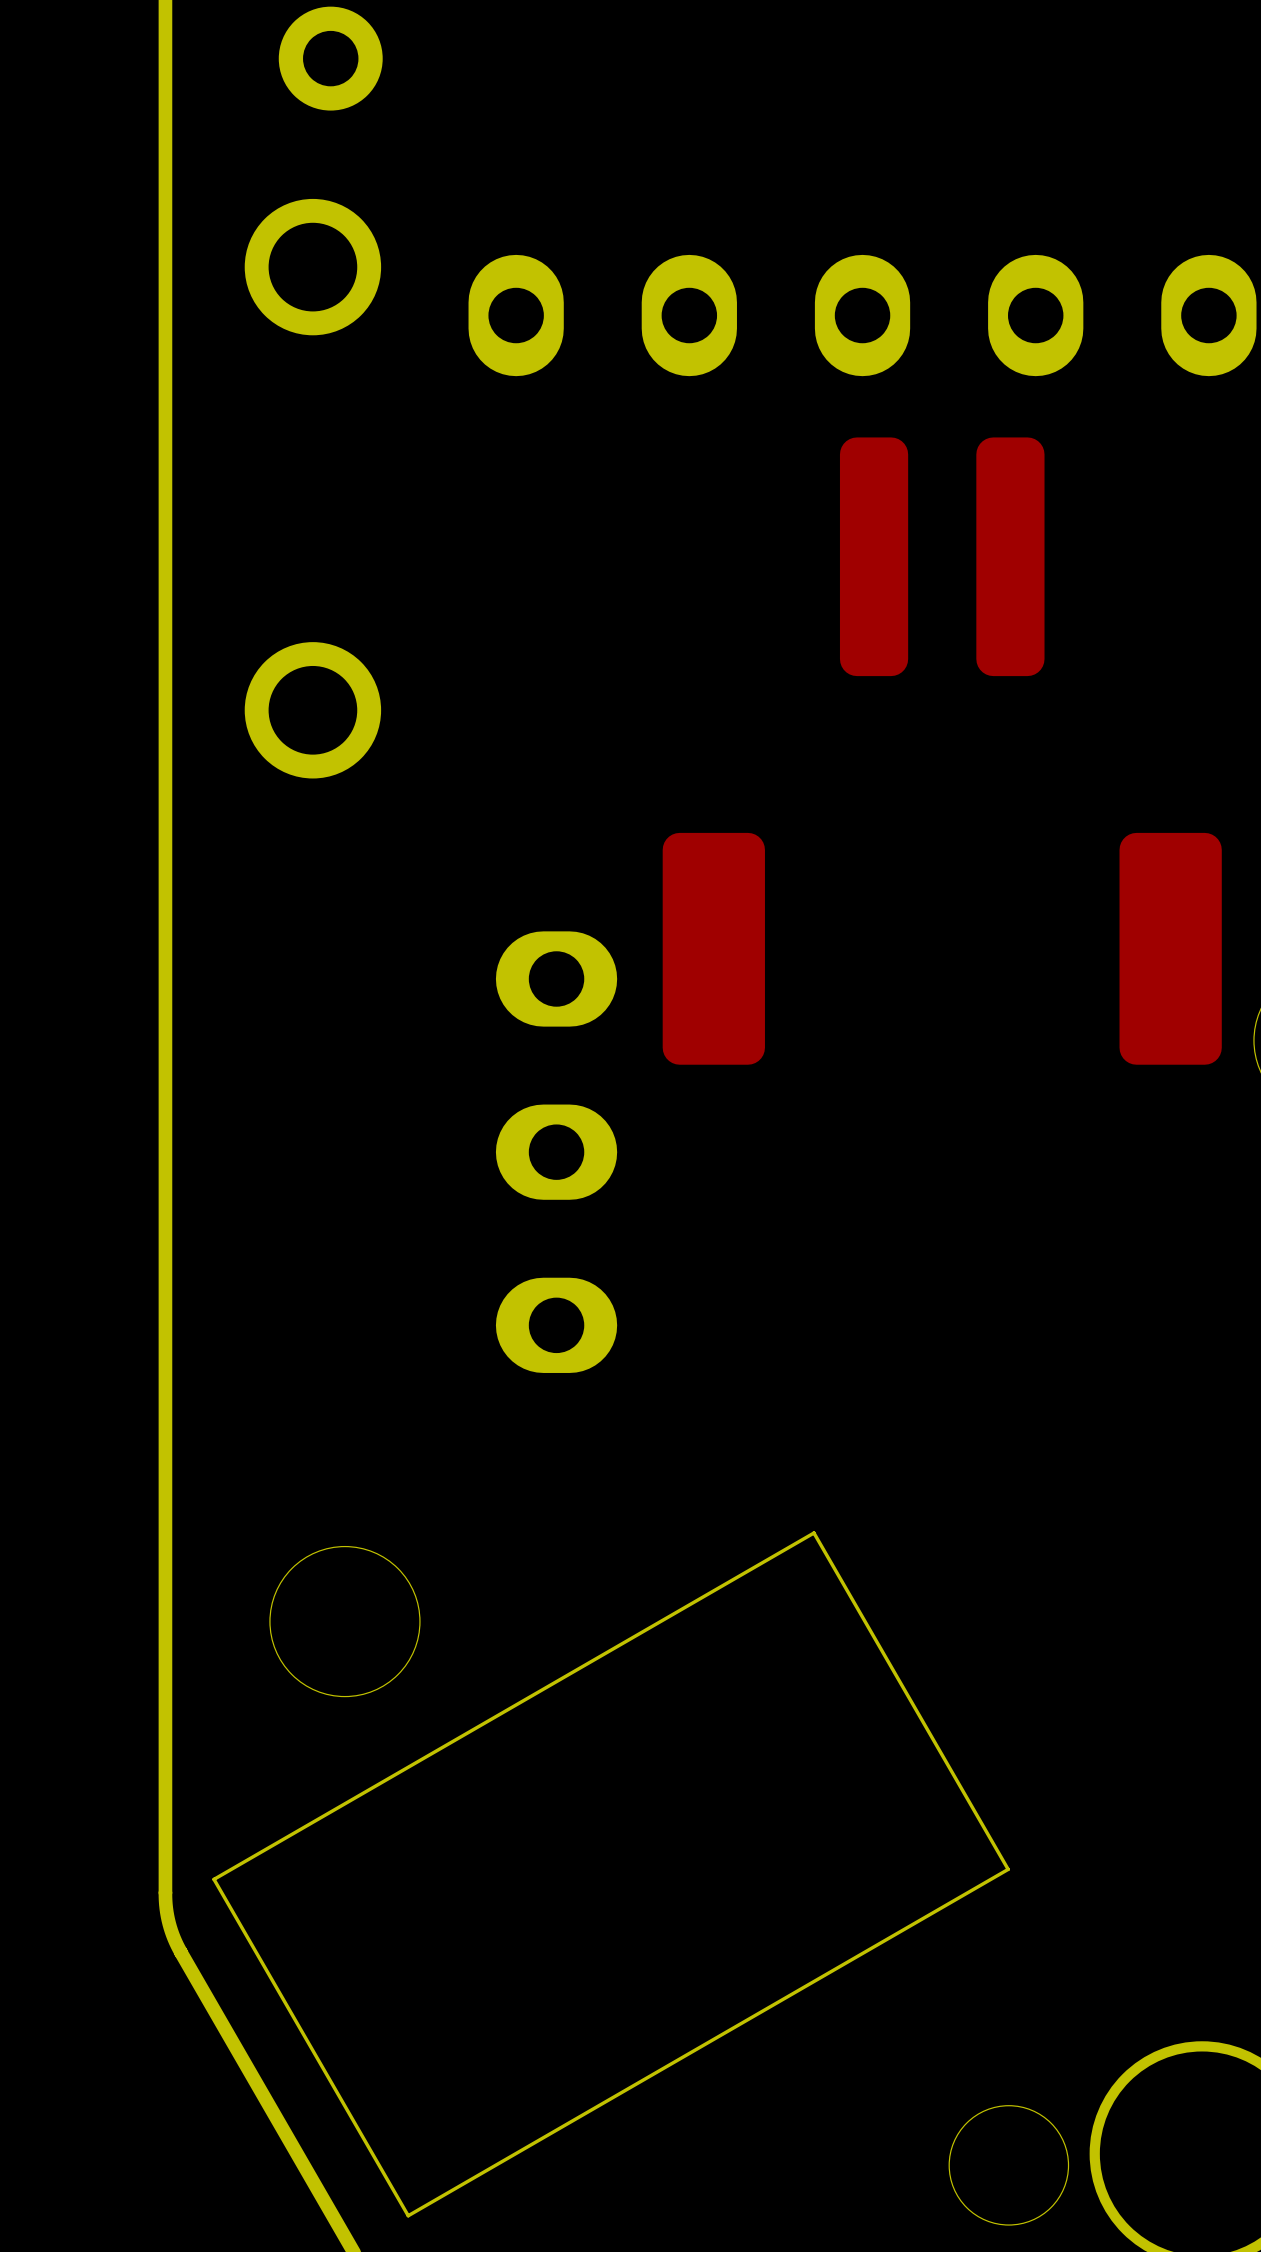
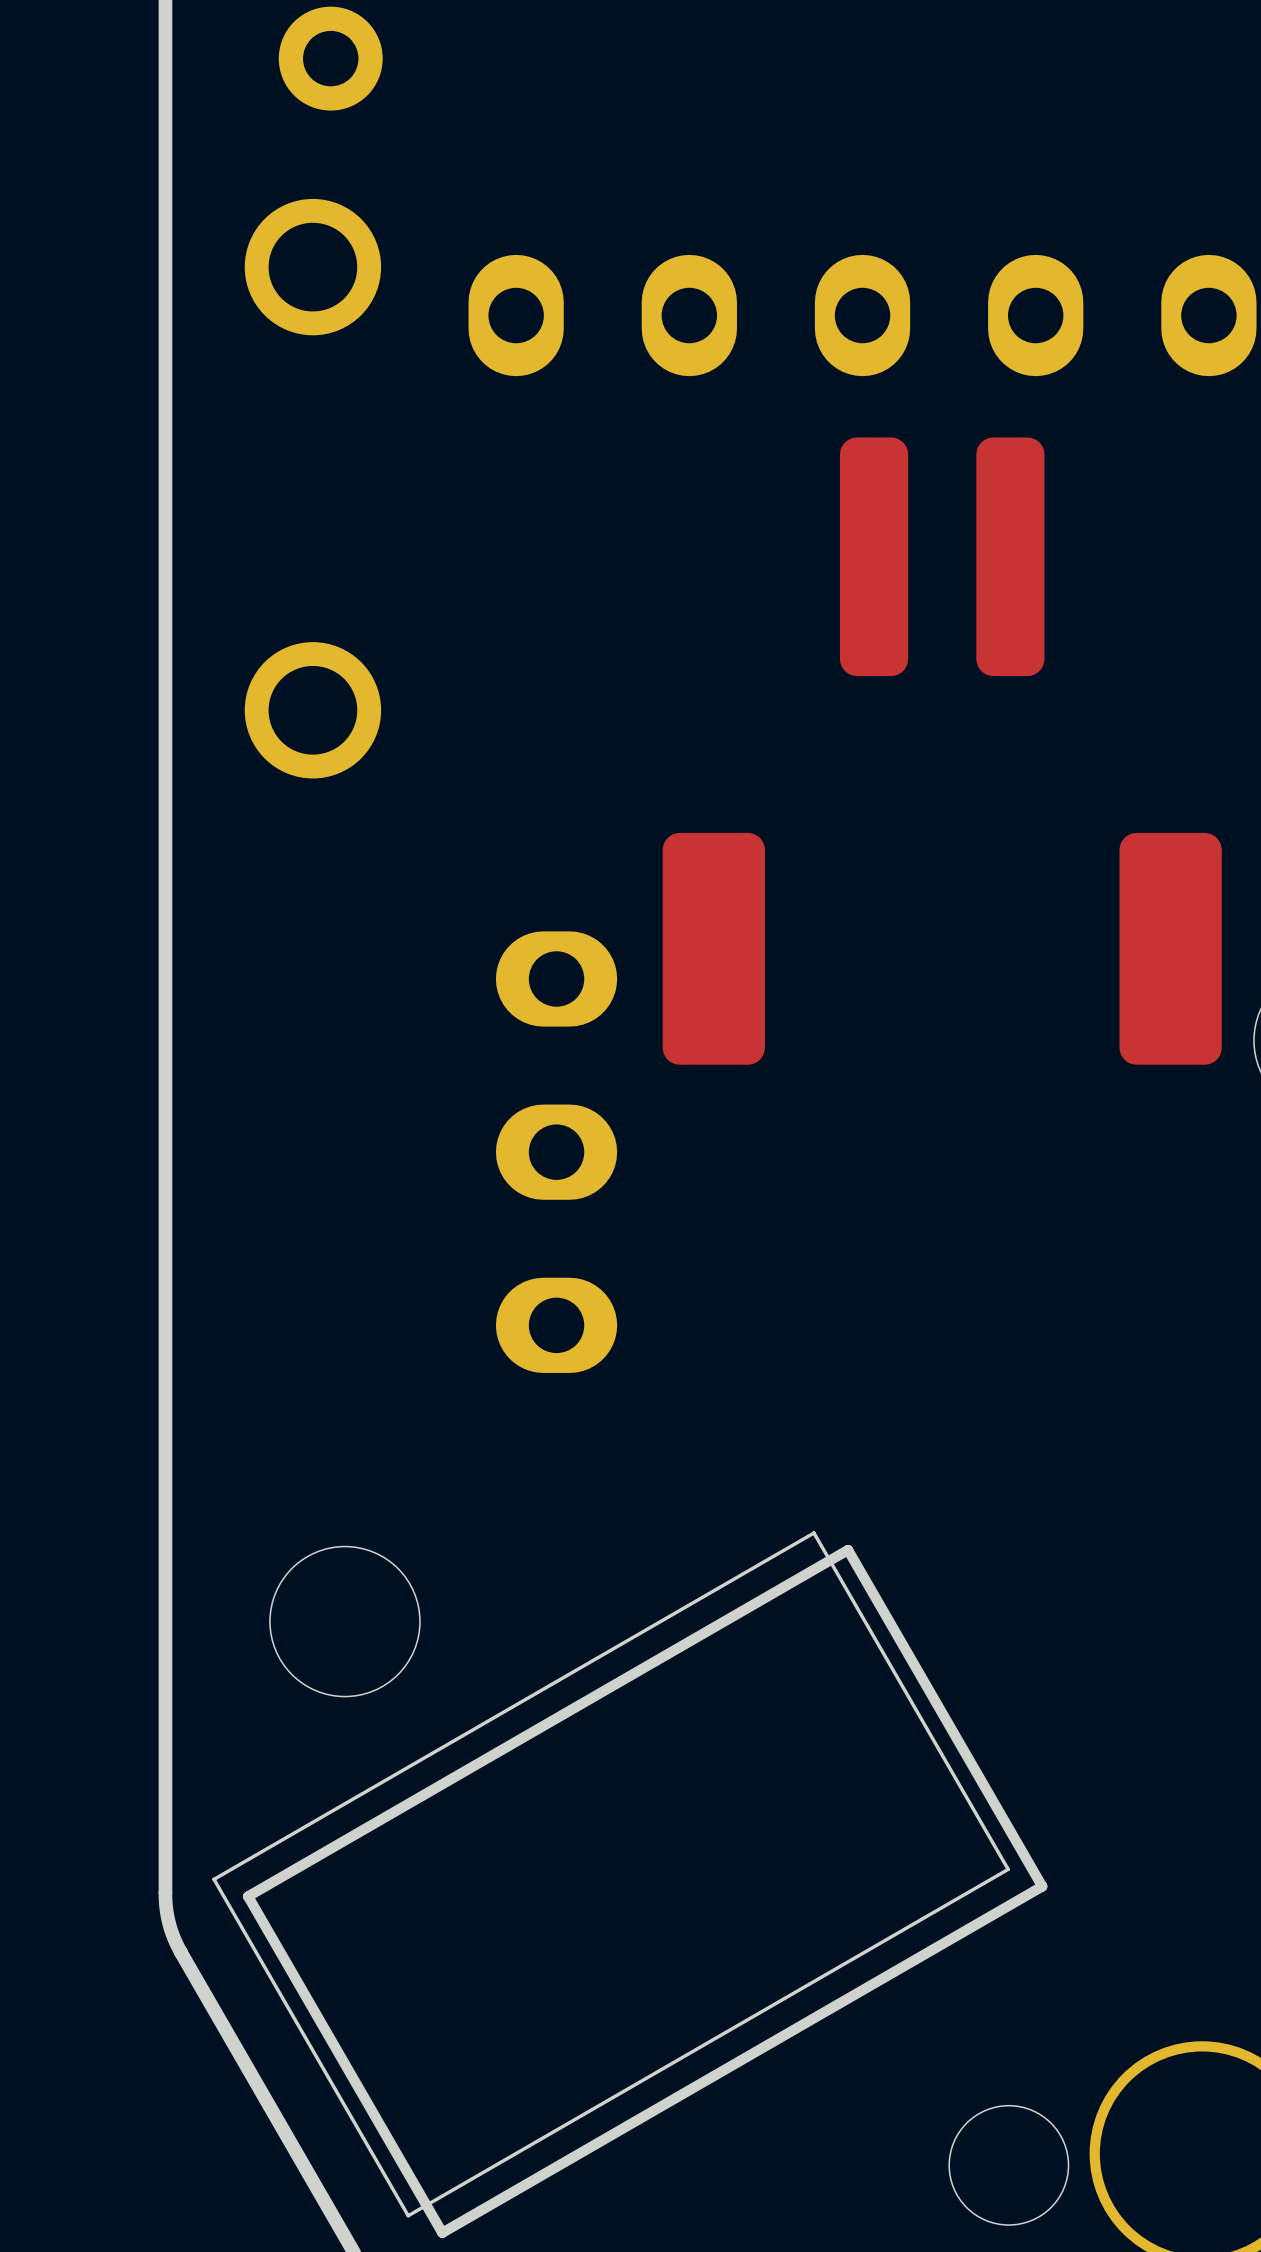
drawing: none -> [212, 1531, 1010, 2218]
board edge: (813, 1533) (214, 1879) (408, 2215) (1008, 1869) (813, 1533) -> (848, 1550) (248, 1896) (442, 2232) (1042, 1886) (848, 1550)

